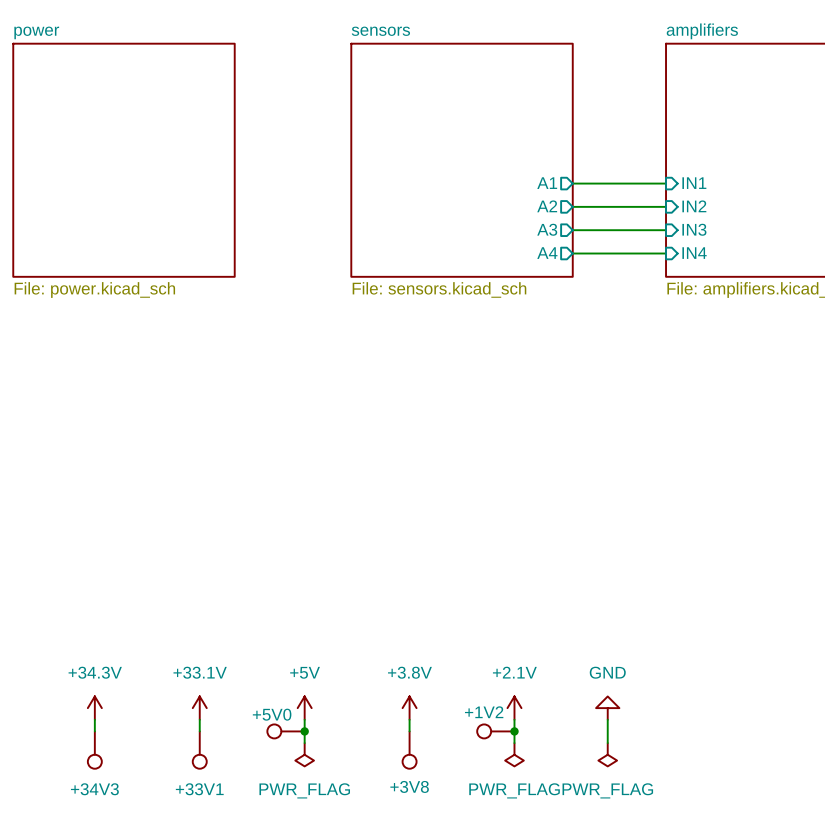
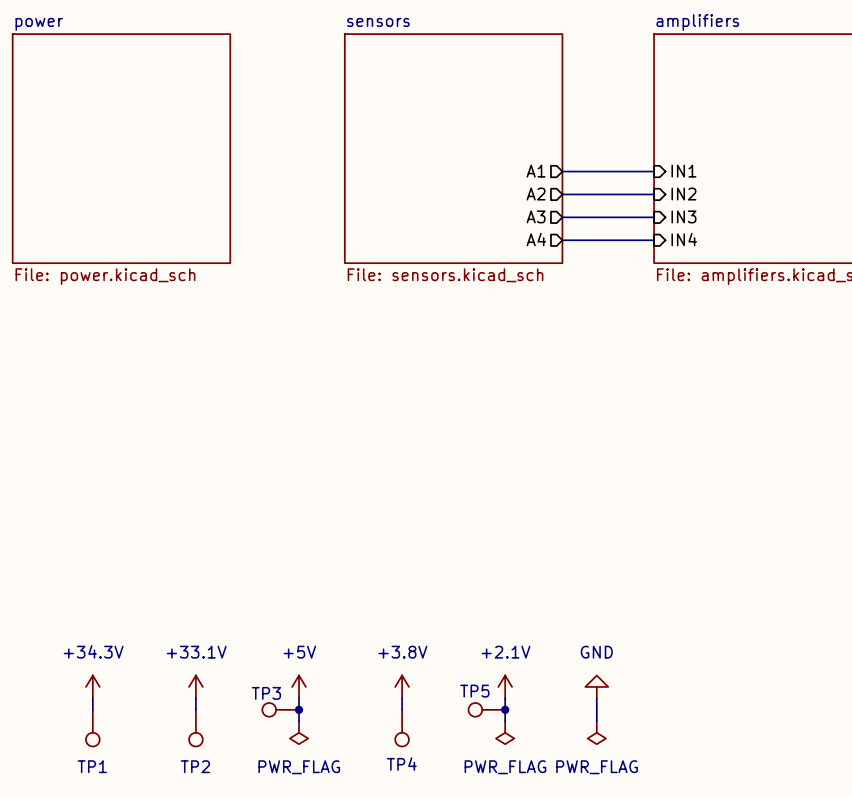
+1V2 name: +1V2 (484, 712) -> TP5 (474, 691)
+5V0 name: +5V0 (272, 714) -> TP3 (266, 693)
+3V8 name: +3V8 (409, 786) -> TP4 (401, 764)
+34V3 name: +34V3 (94, 789) -> TP1 (92, 766)
+33V1 name: +33V1 (199, 789) -> TP2 (195, 766)

